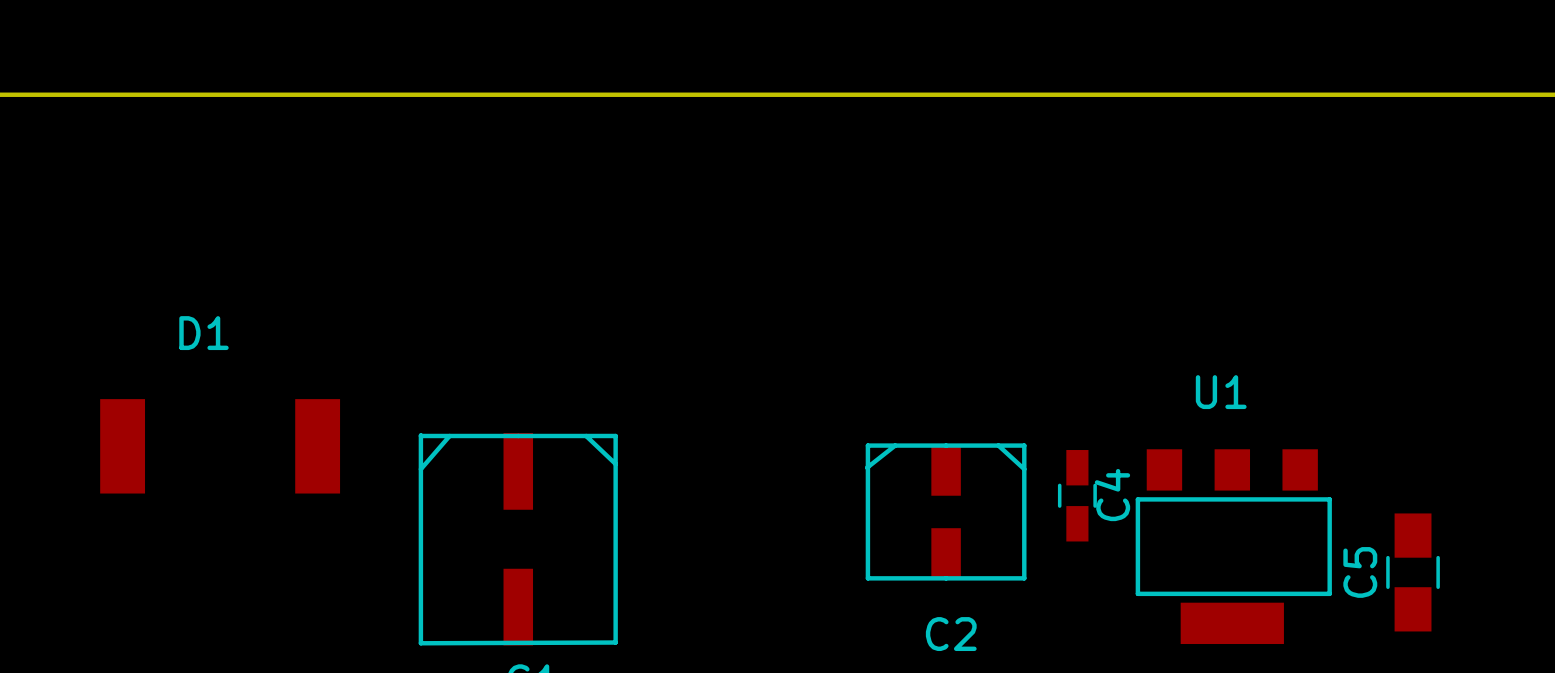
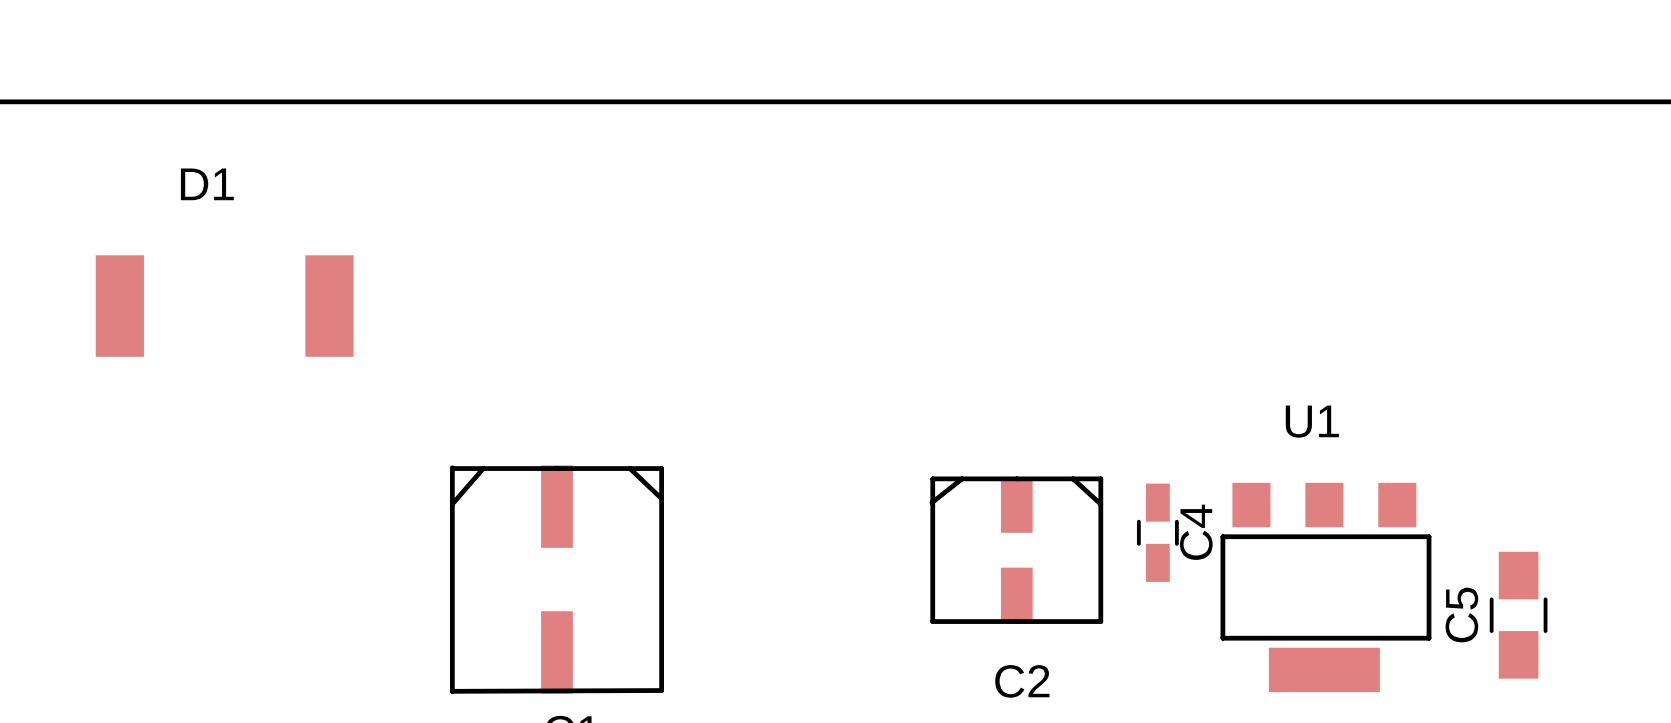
D1 position: (220, 446) -> (224, 306)

